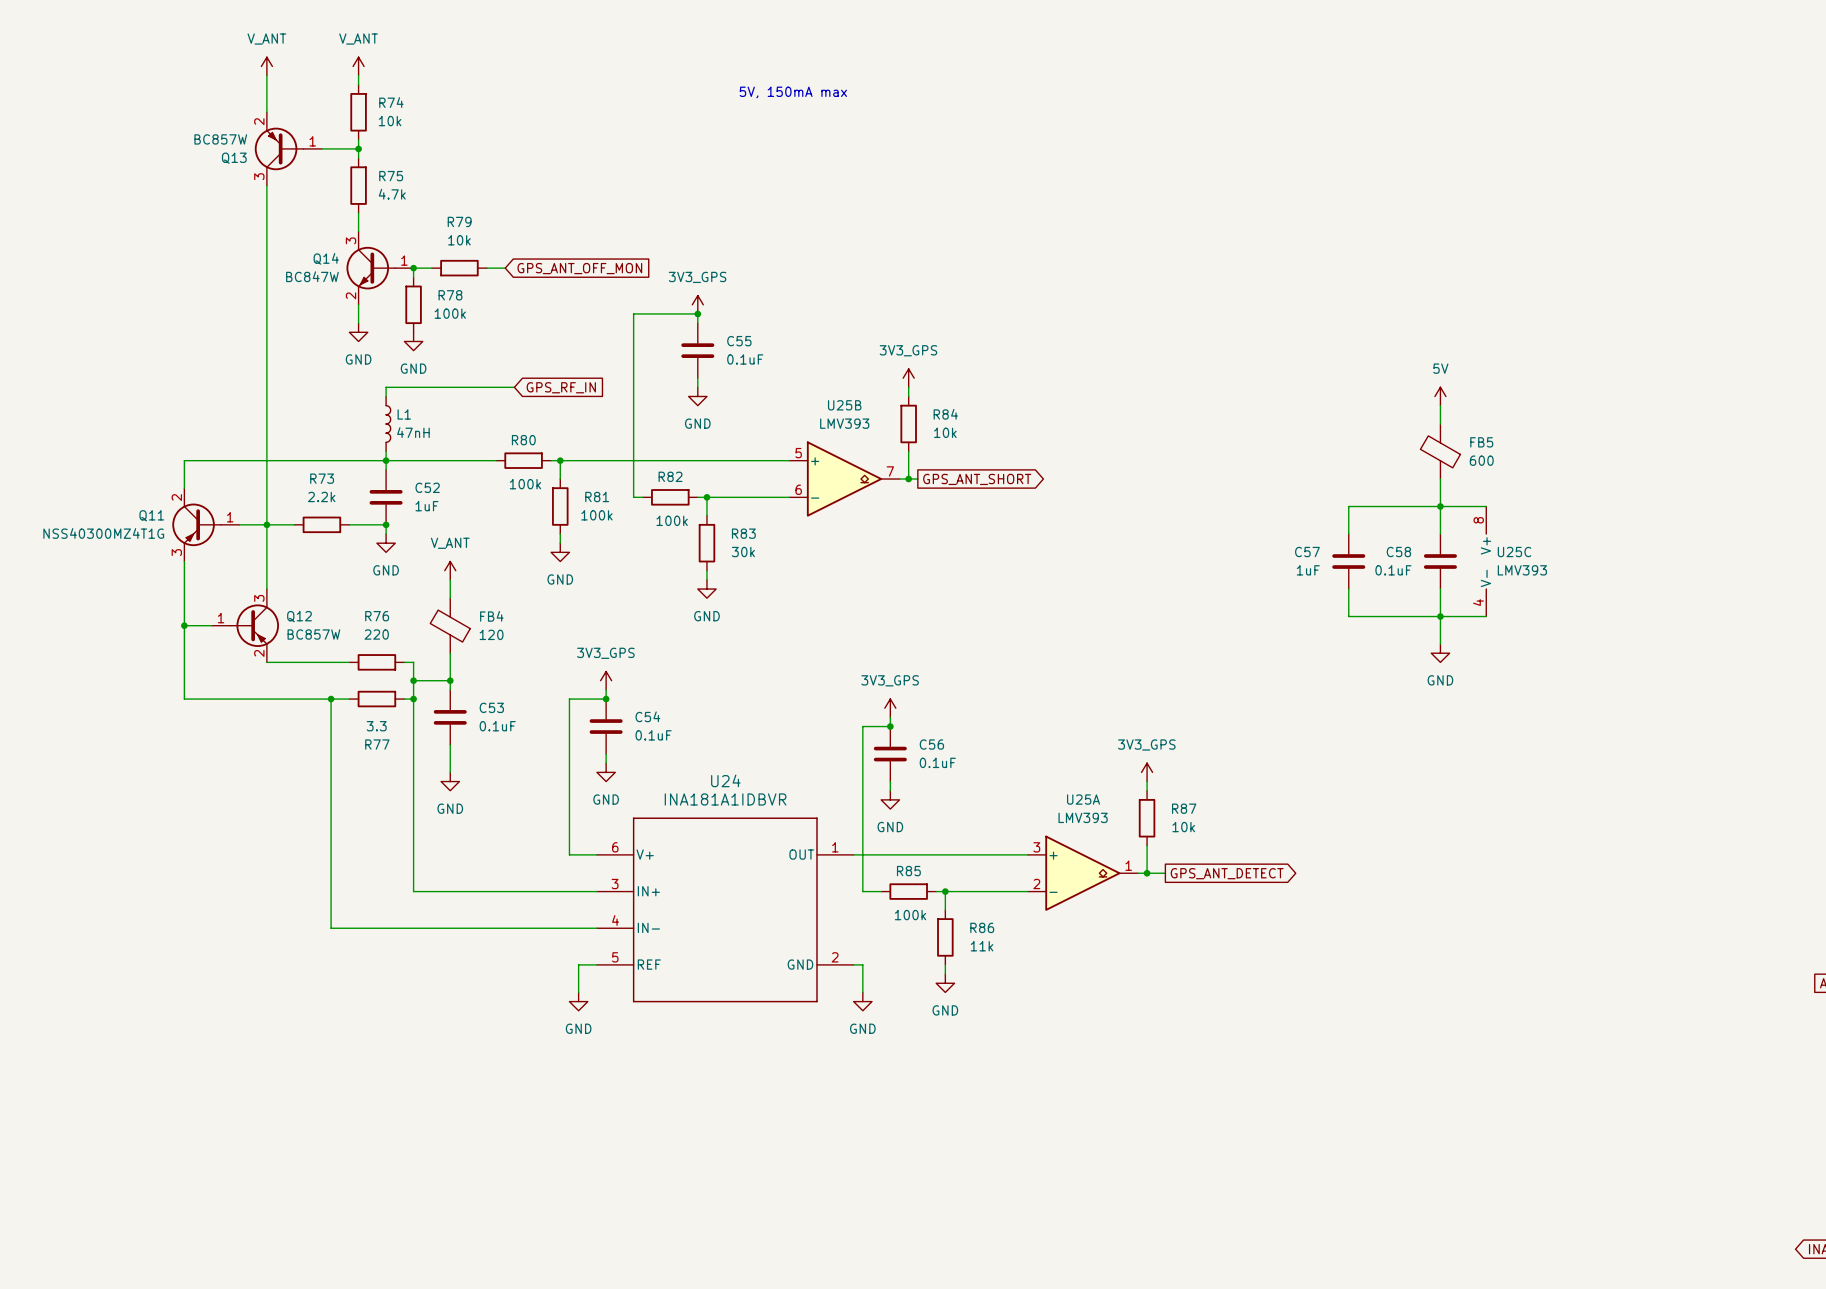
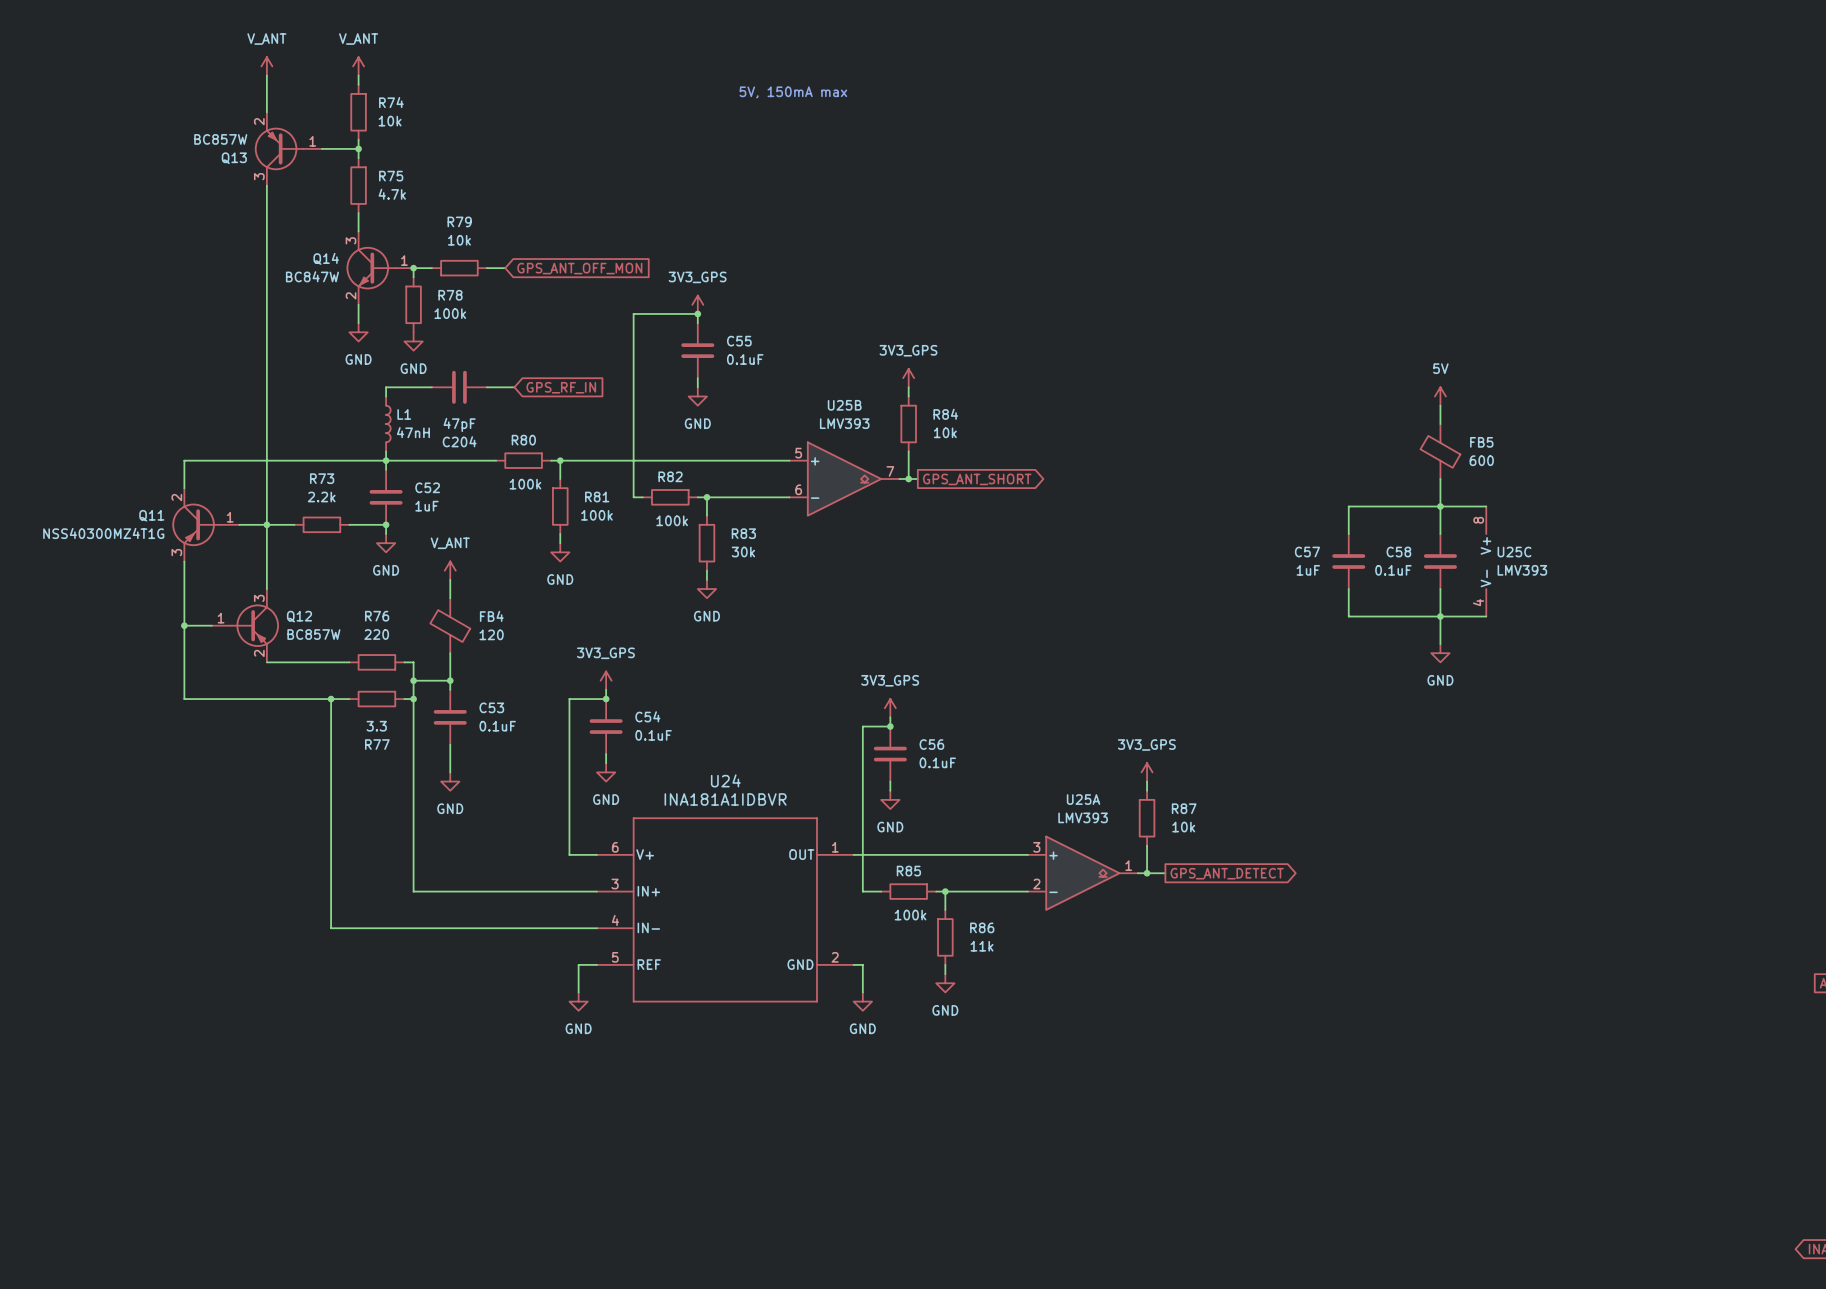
C204: none -> 47pF (459, 387)

